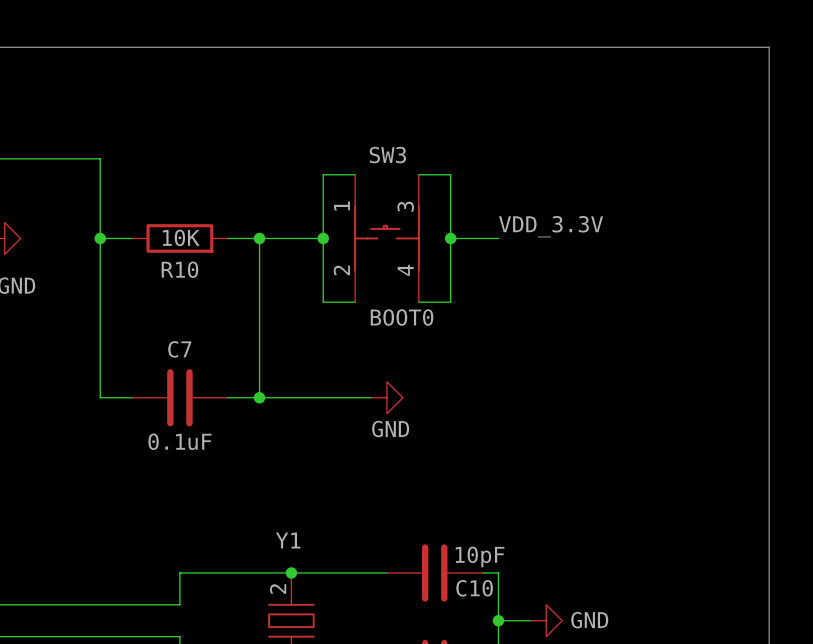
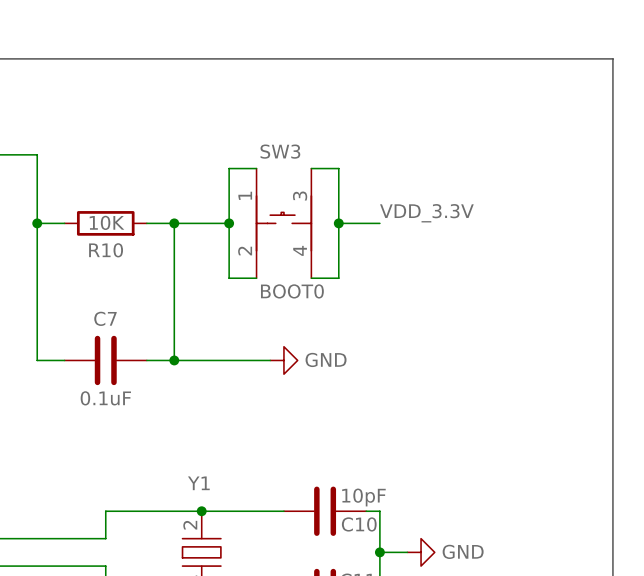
power symbol text position: GND (390, 429) -> GND (326, 359)

